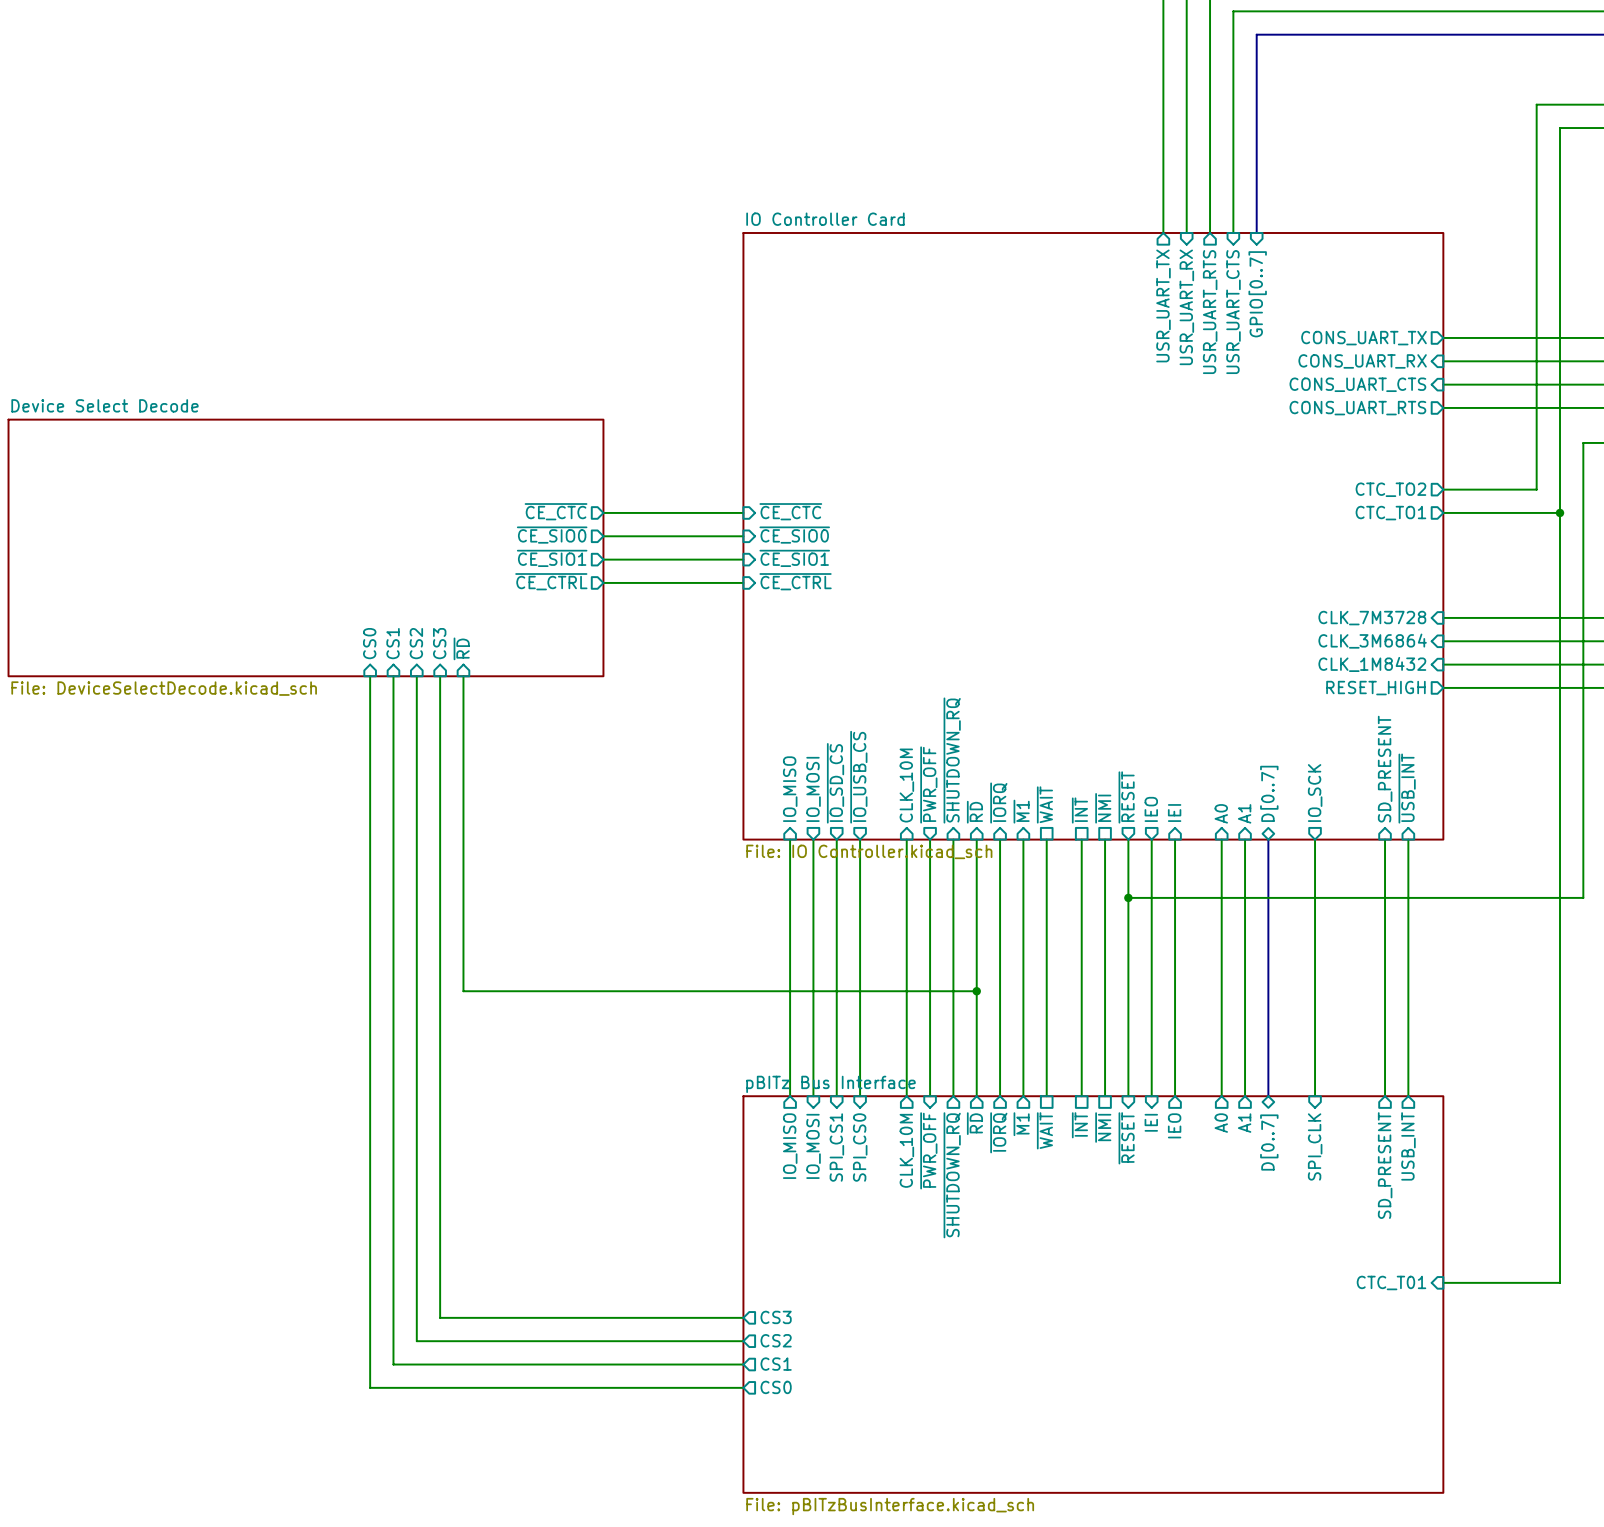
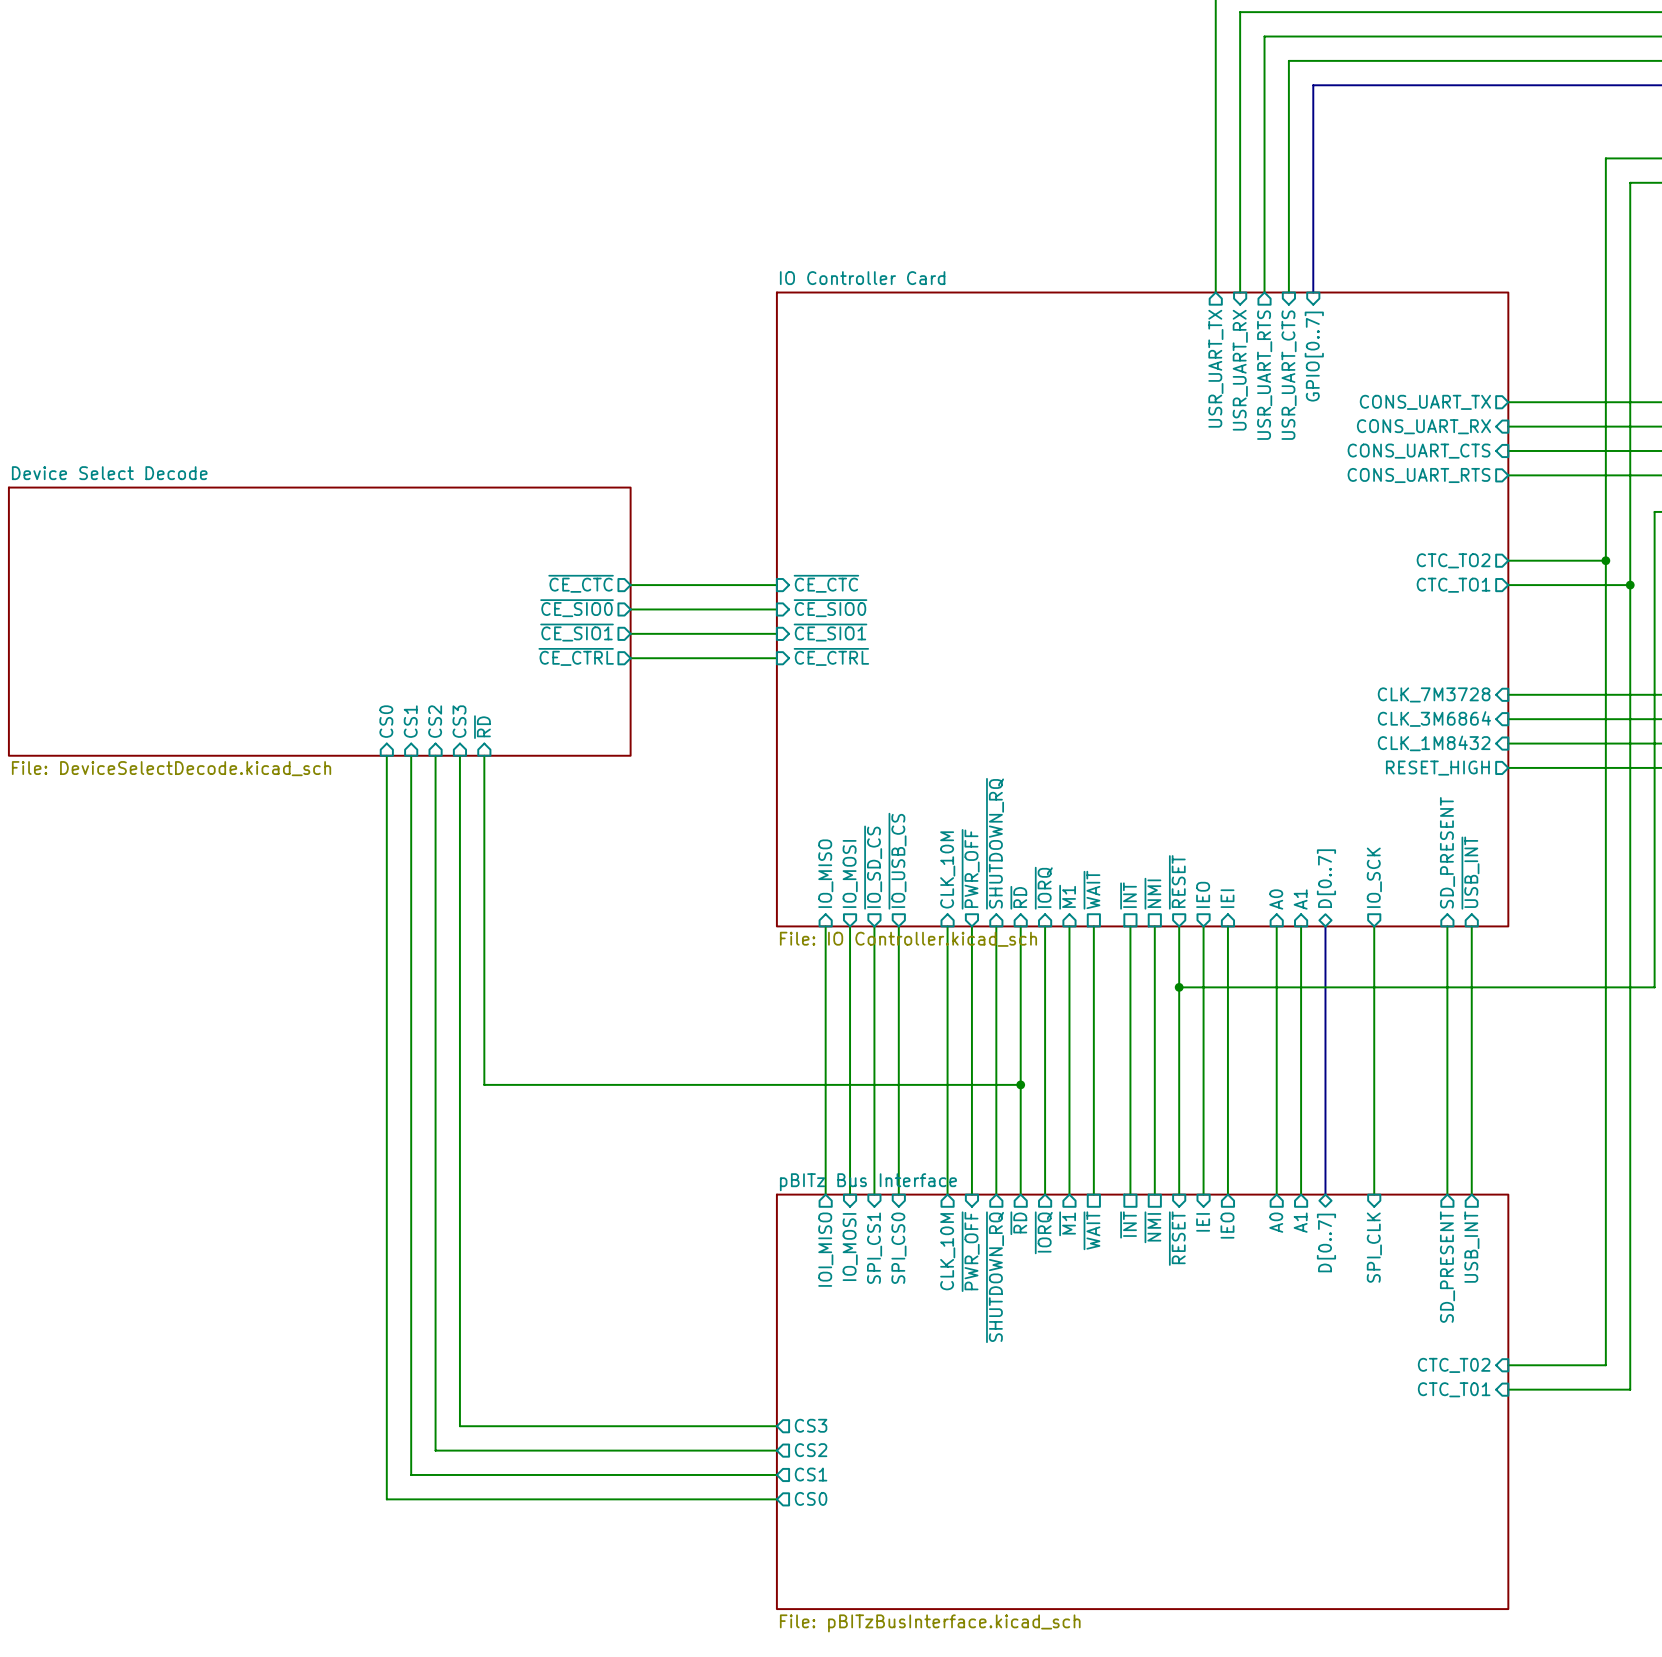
wire: none -> (1605, 560) (1605, 1365) (1508, 1365)
junction: none -> (1605, 560)
sheet pin: IO_MISO (790, 1146) -> IOI_MISO (825, 1249)
sheet pin: none -> CTC_T02 (1454, 1365)

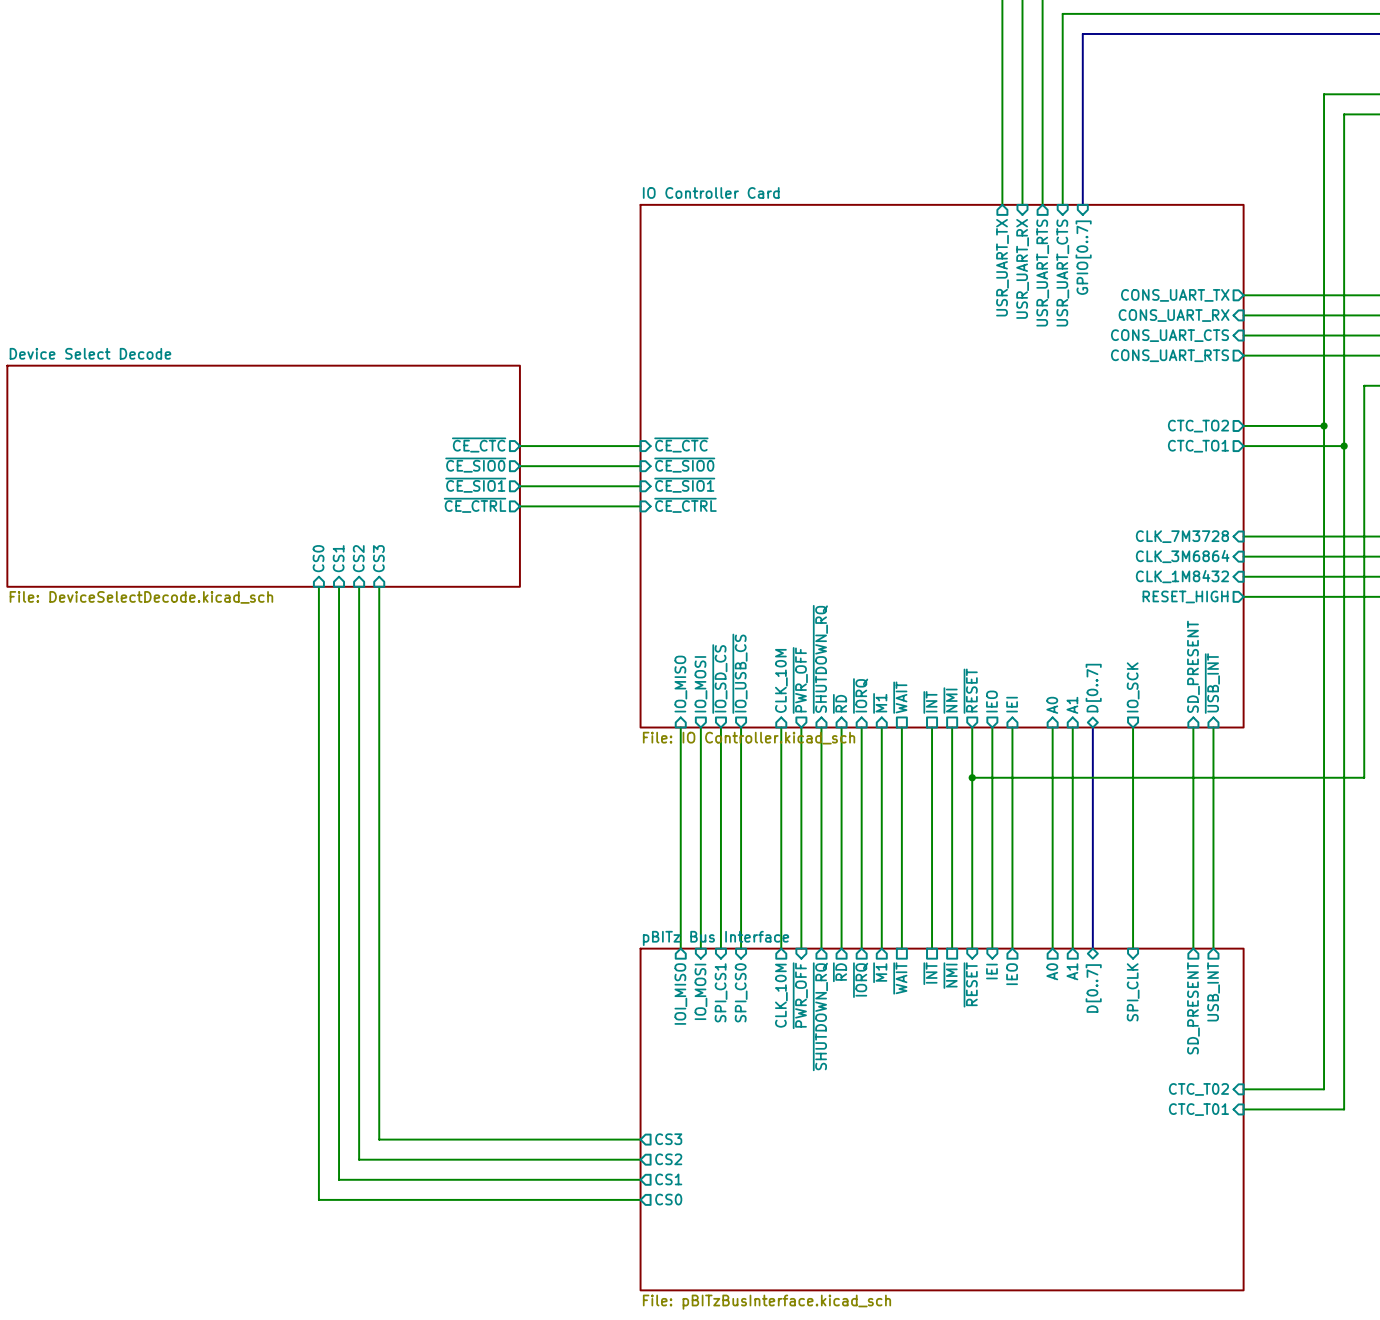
sheet pin: ~{RD} (482, 727) -> none
wire: (484, 755) (484, 1084) (1020, 1084) -> none
junction: (1020, 1084) -> none

